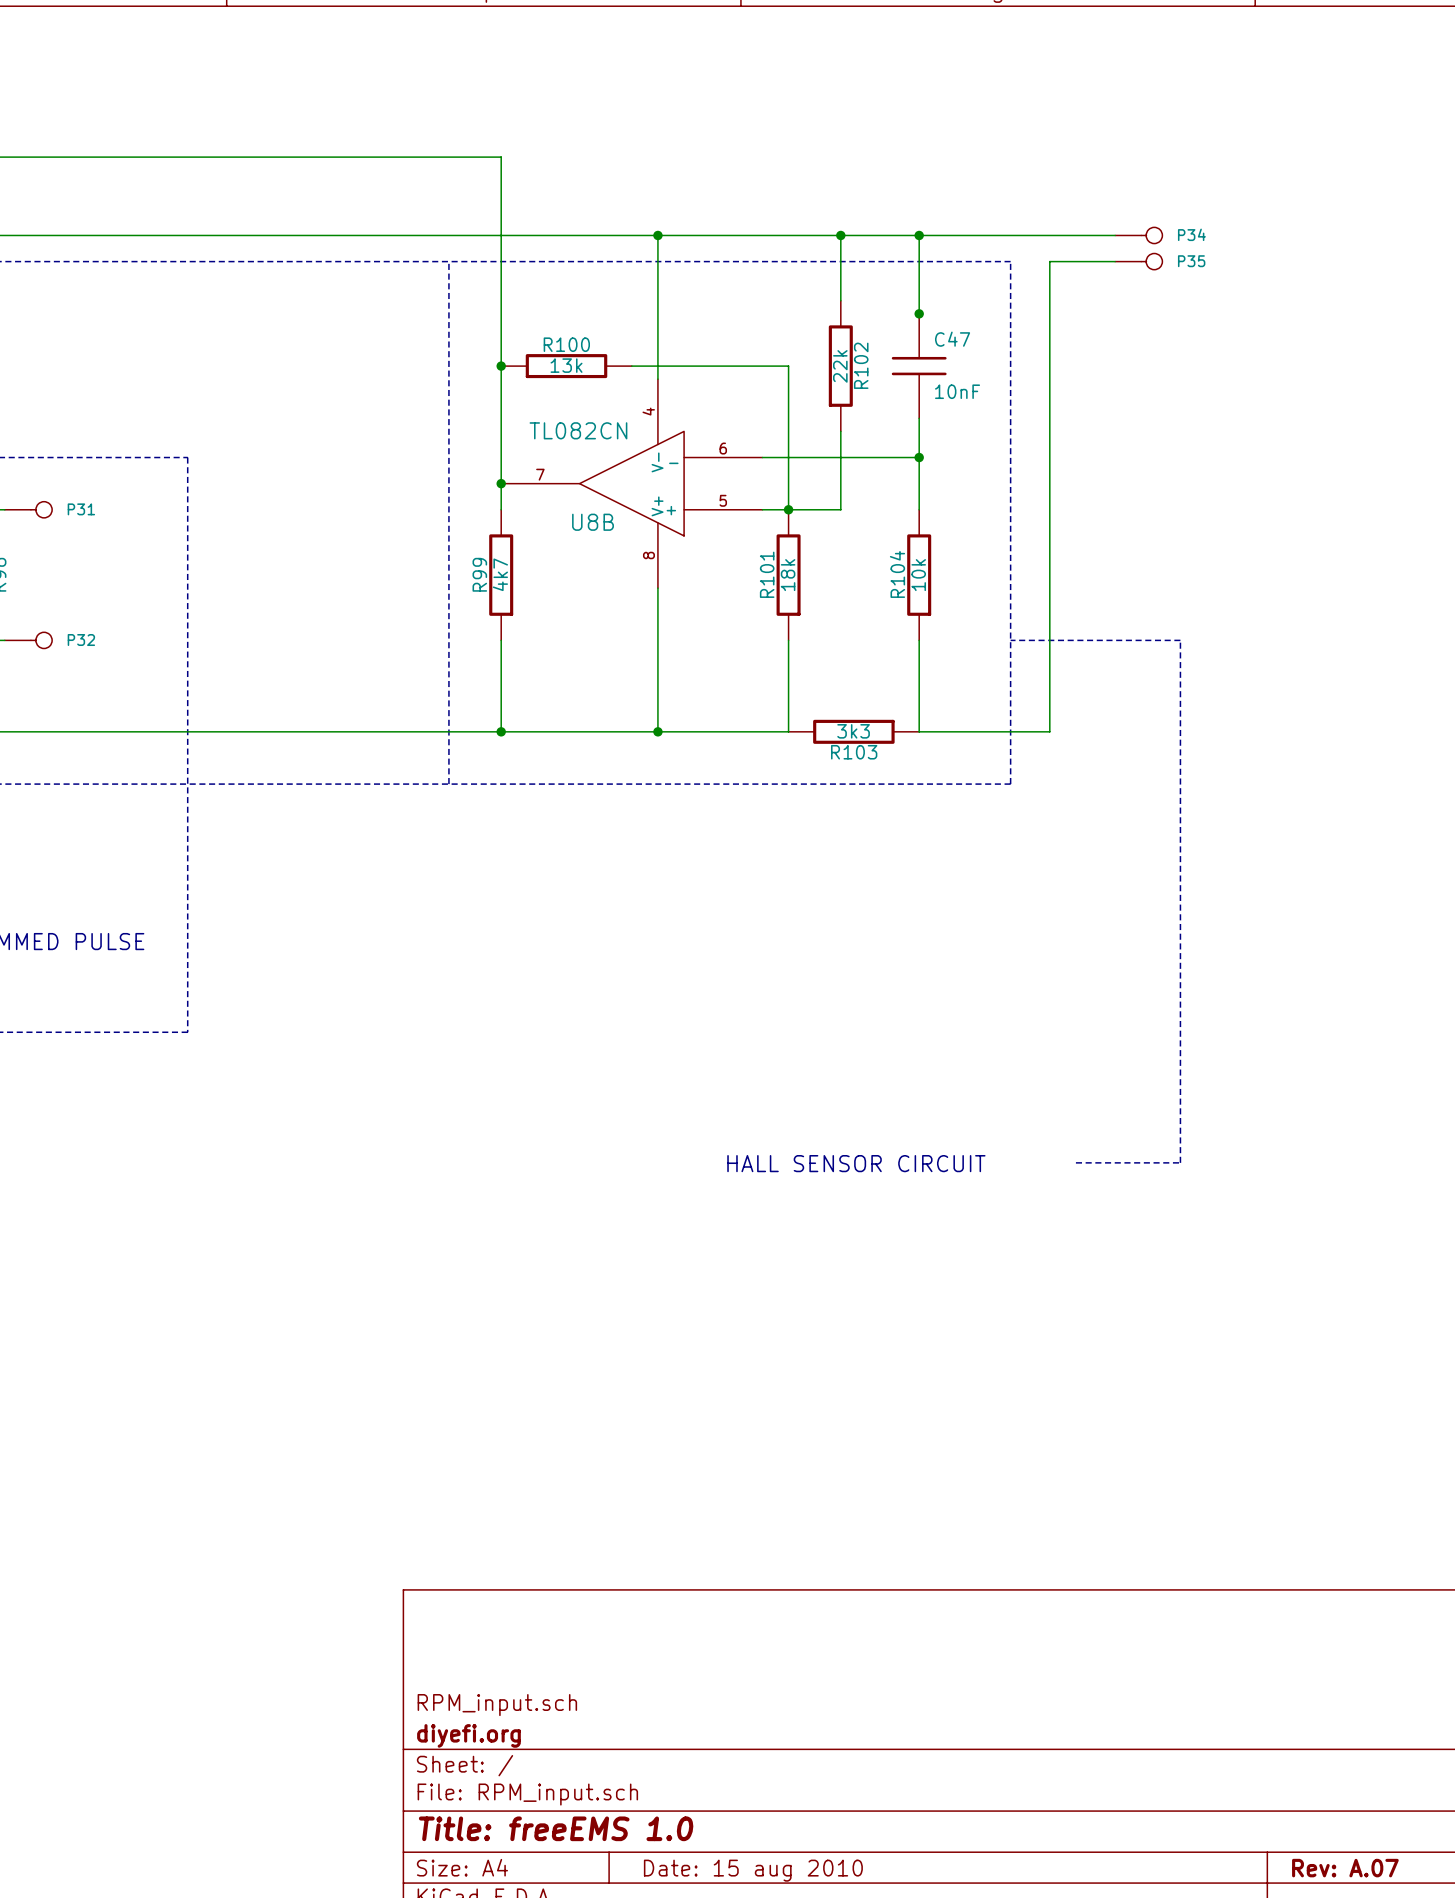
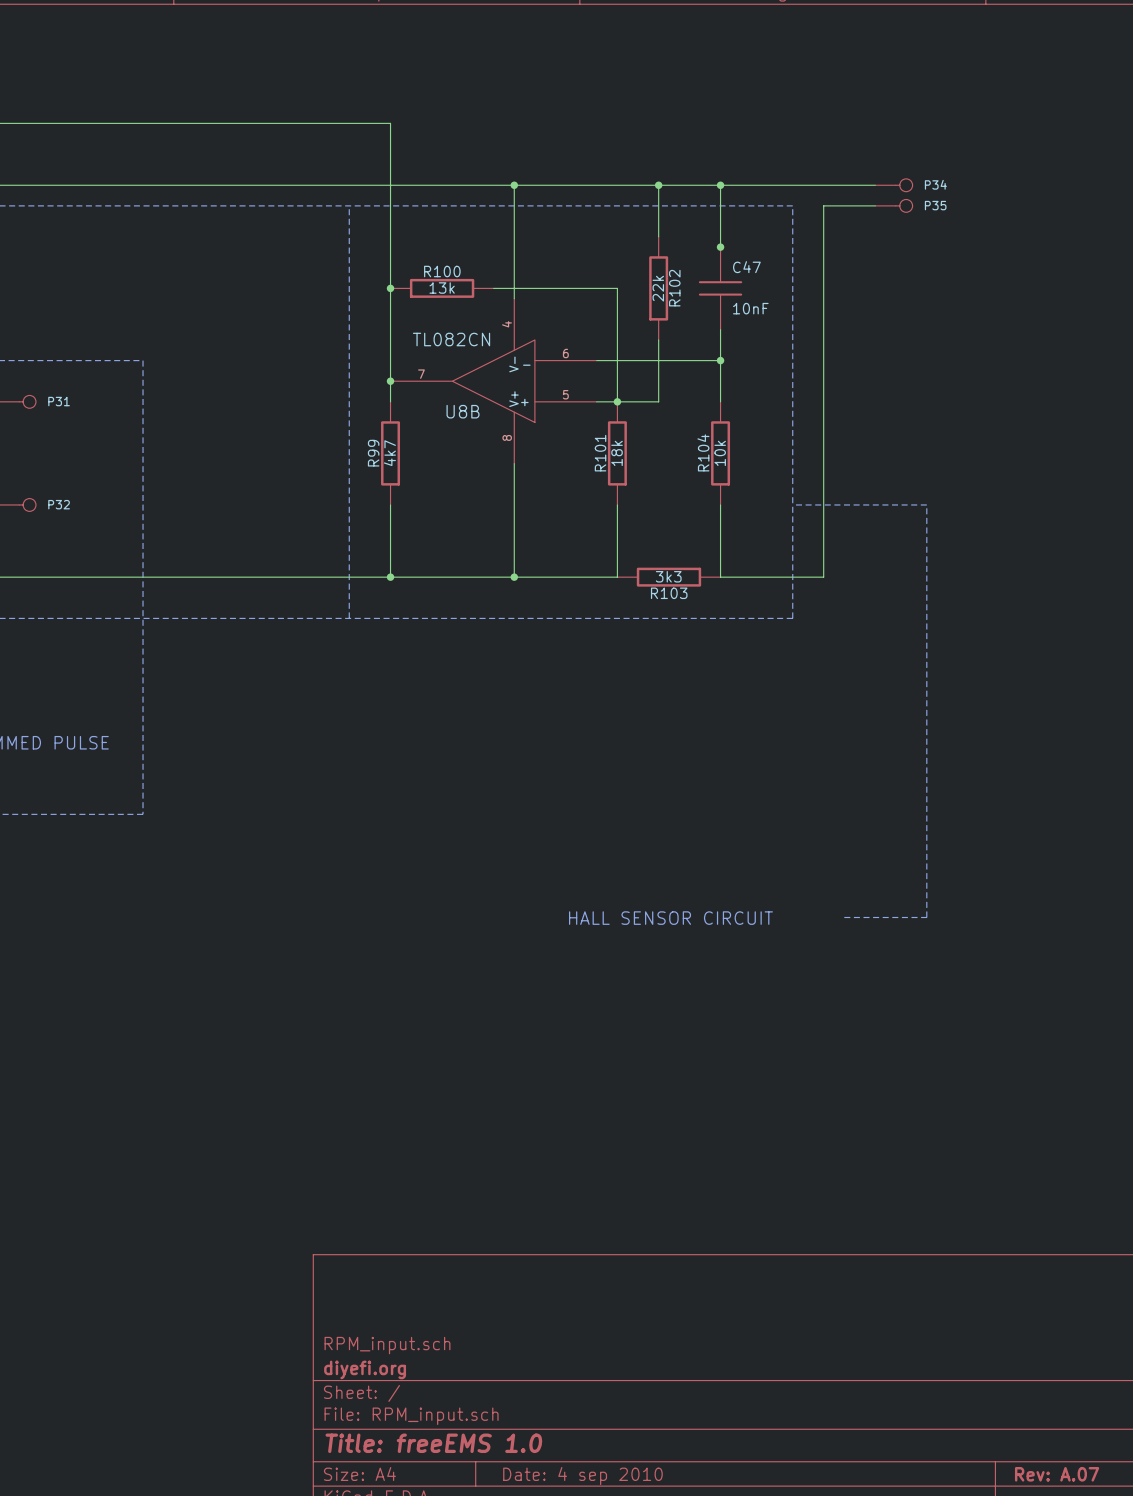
title block: Date: 15 aug 2010 (753, 1870) -> Date: 4 sep 2010 (582, 1476)

